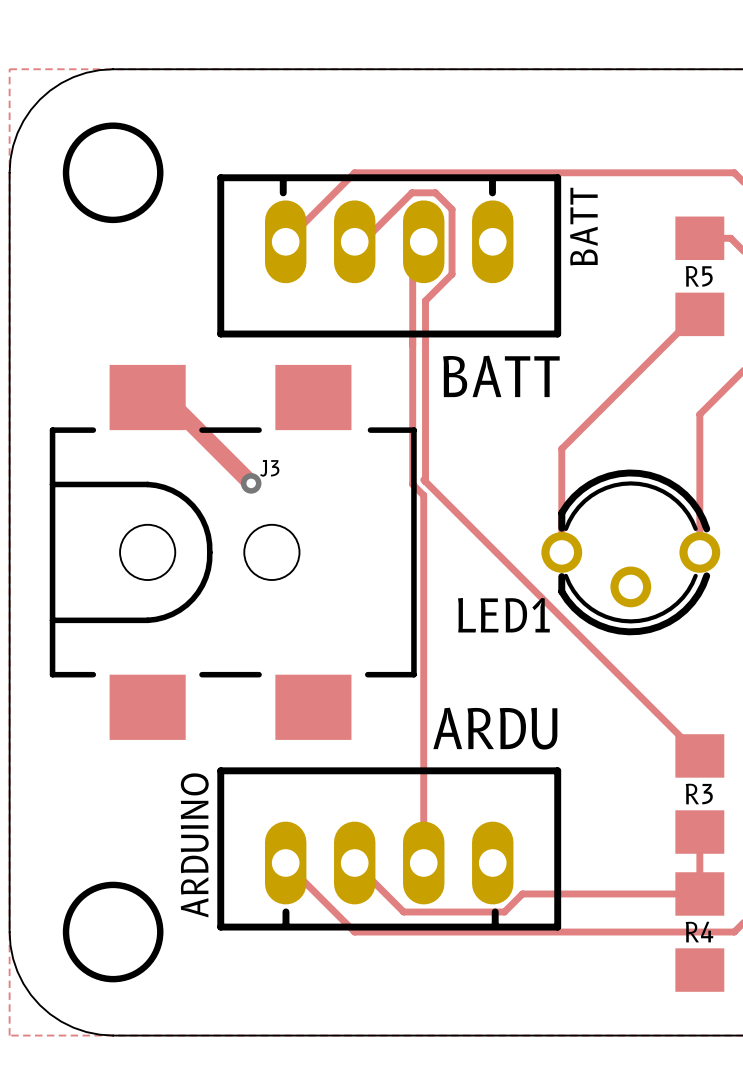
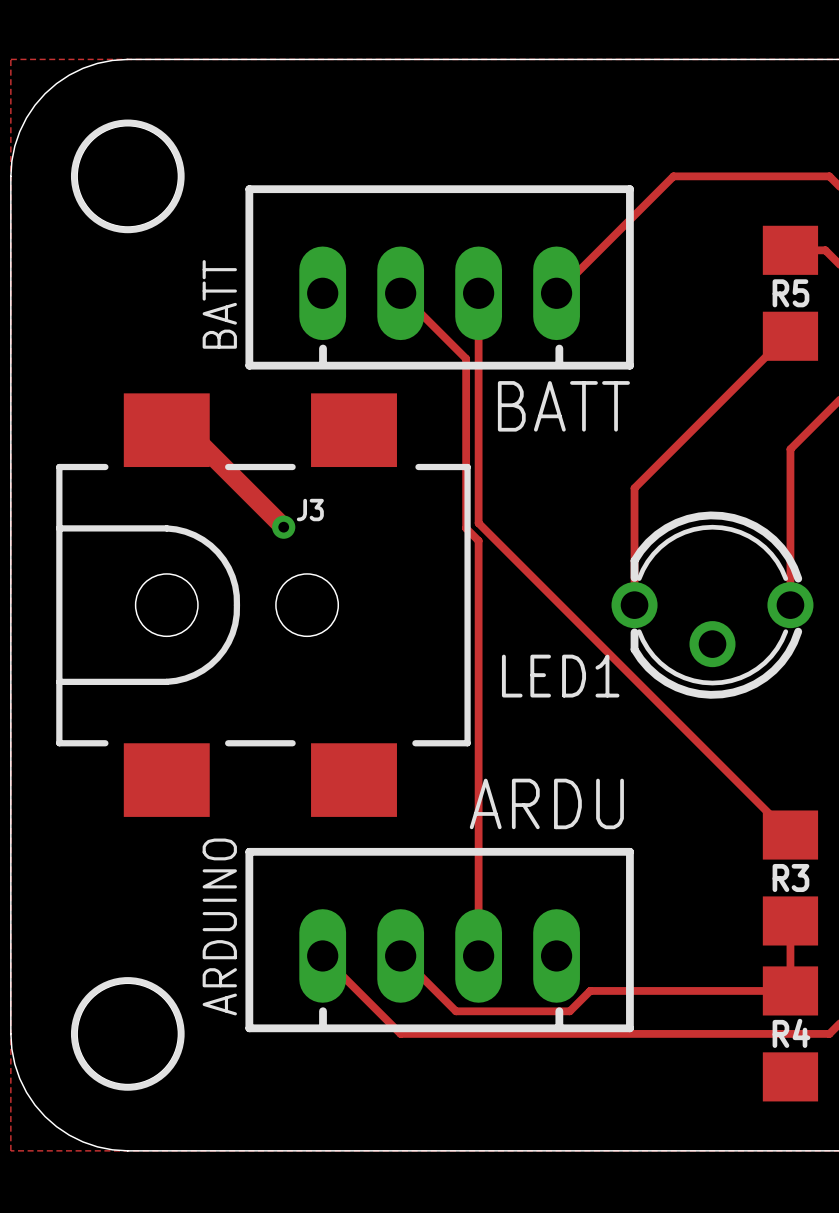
track: (596, 172) (354, 172) (285, 241) -> (673, 176) (556, 293)
track: (354, 241) (363, 241) (412, 192) (435, 192) (452, 209) (452, 274) (425, 300) (425, 481) -> none
track: (423, 241) (412, 252) (412, 334) -> (400, 293) (466, 358)
BATT rotation: 0° (389, 255) -> 180° (439, 277)
track: none -> (478, 293) (478, 523)

